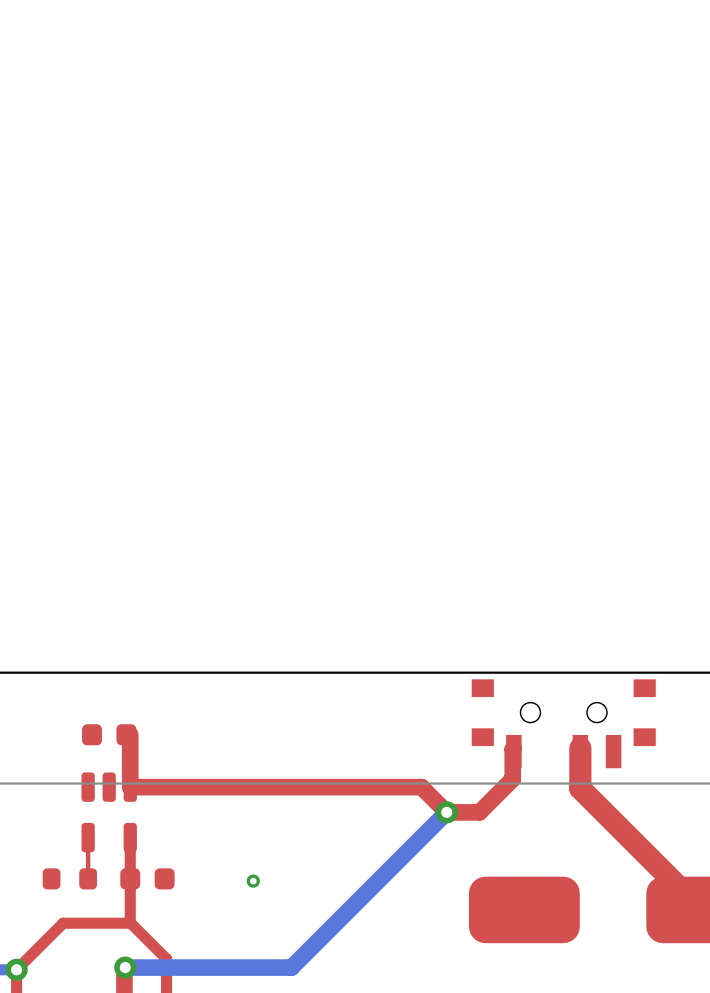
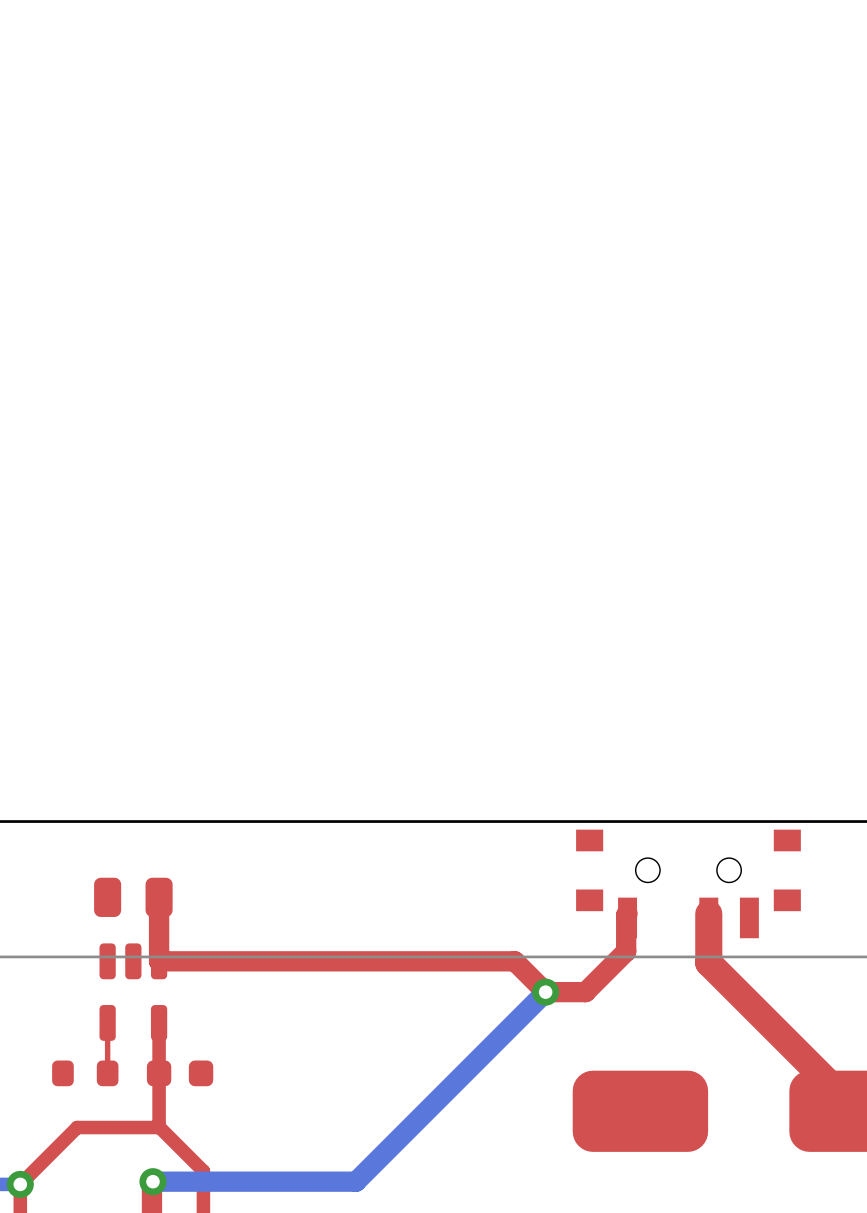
part footprint: [82, 724, 137, 746] -> [94, 877, 173, 917]
via: (253, 881) -> none

